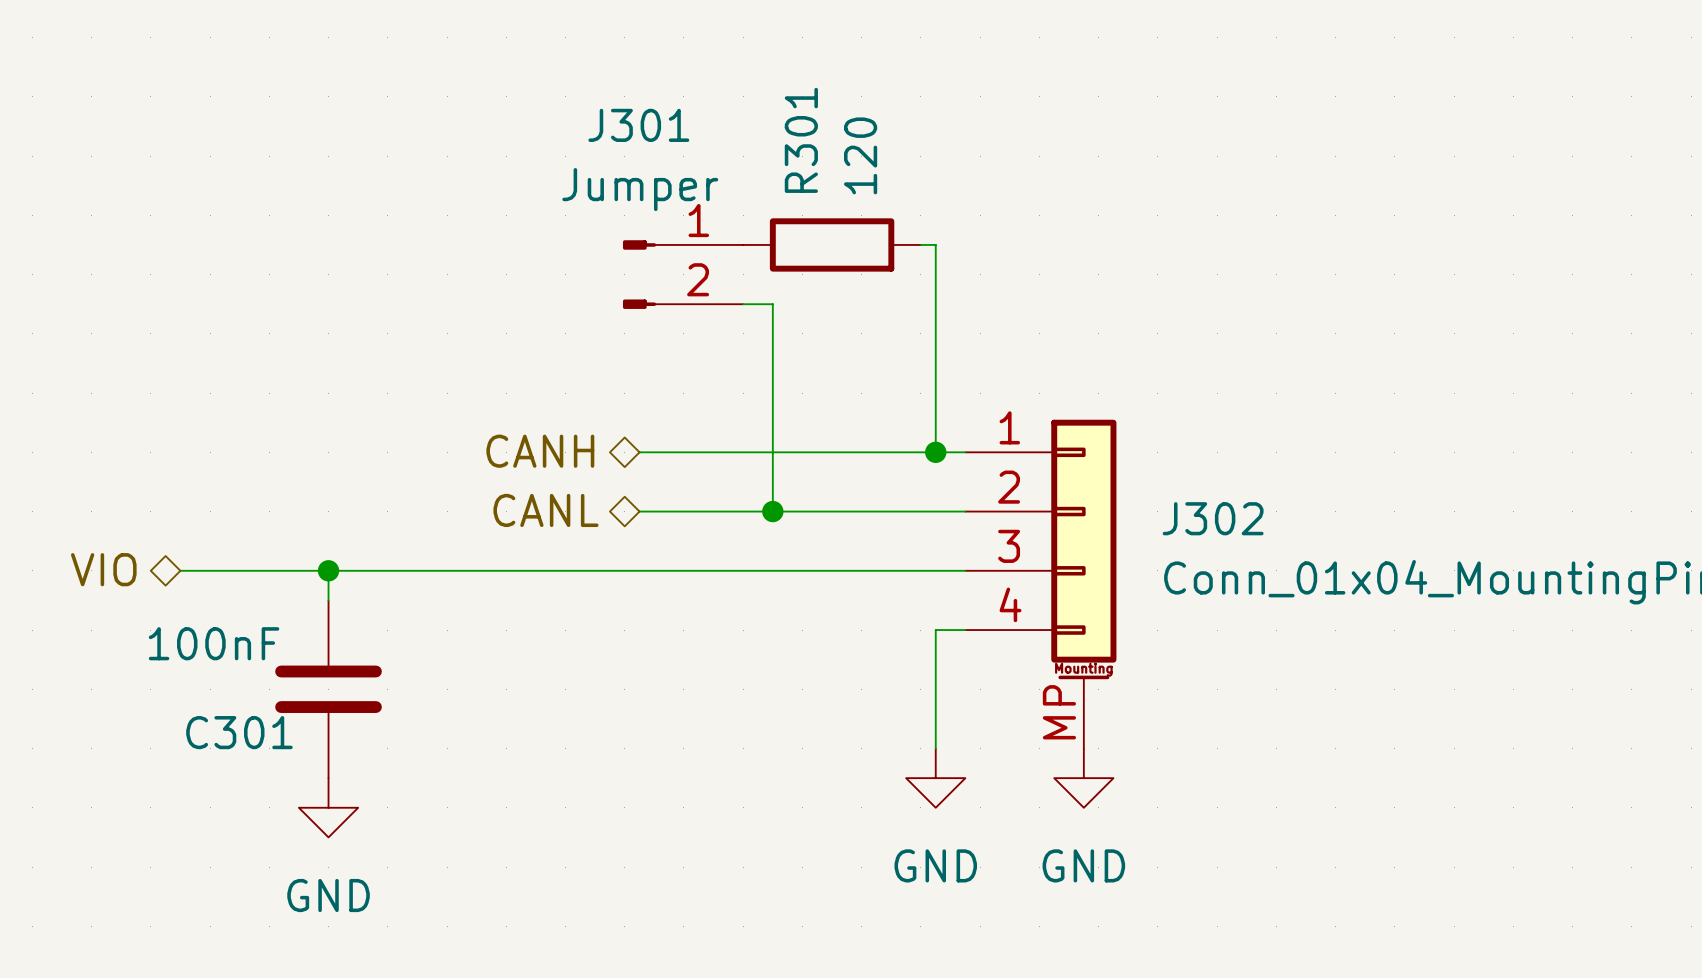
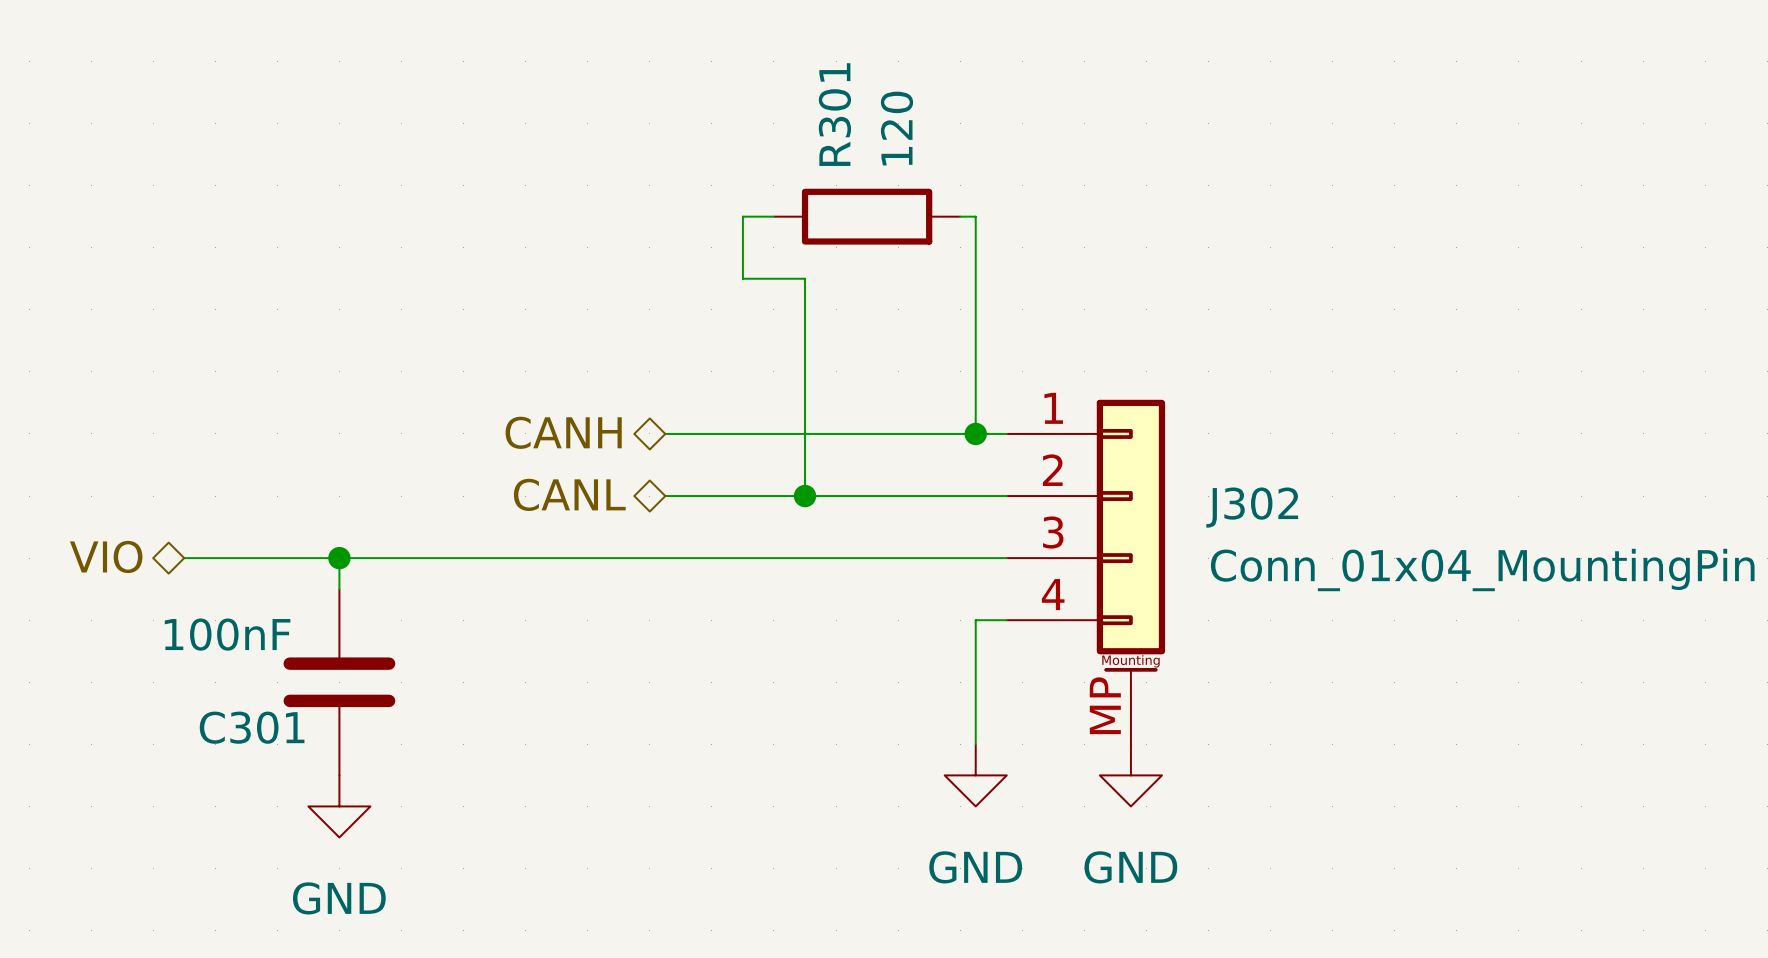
wire: none -> (773, 216) (742, 216) (742, 278) (773, 278)
J301: Jumper (683, 274) -> none

